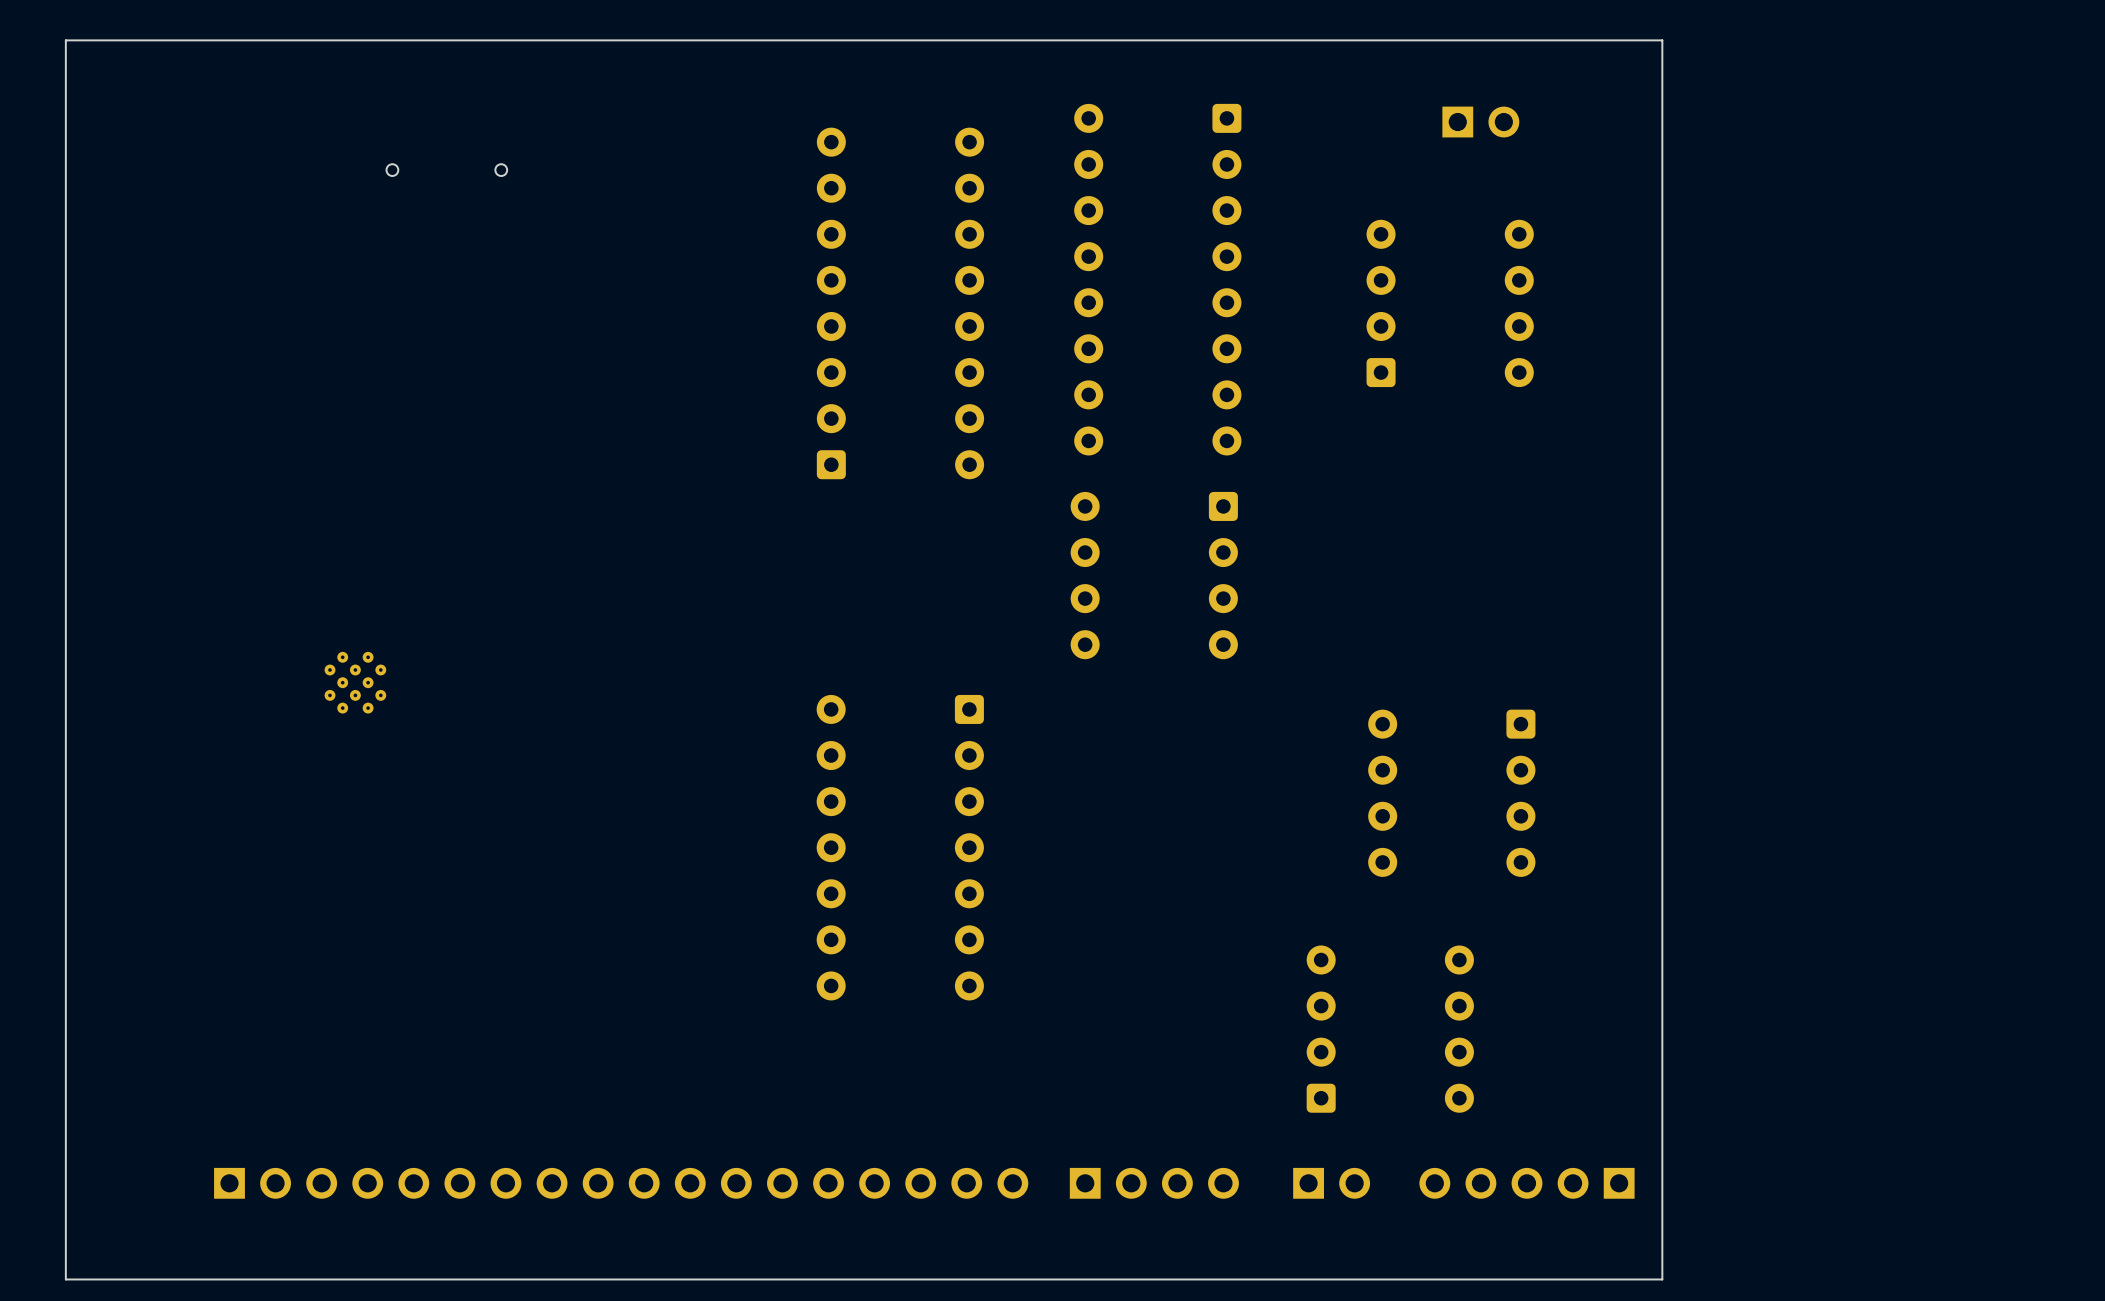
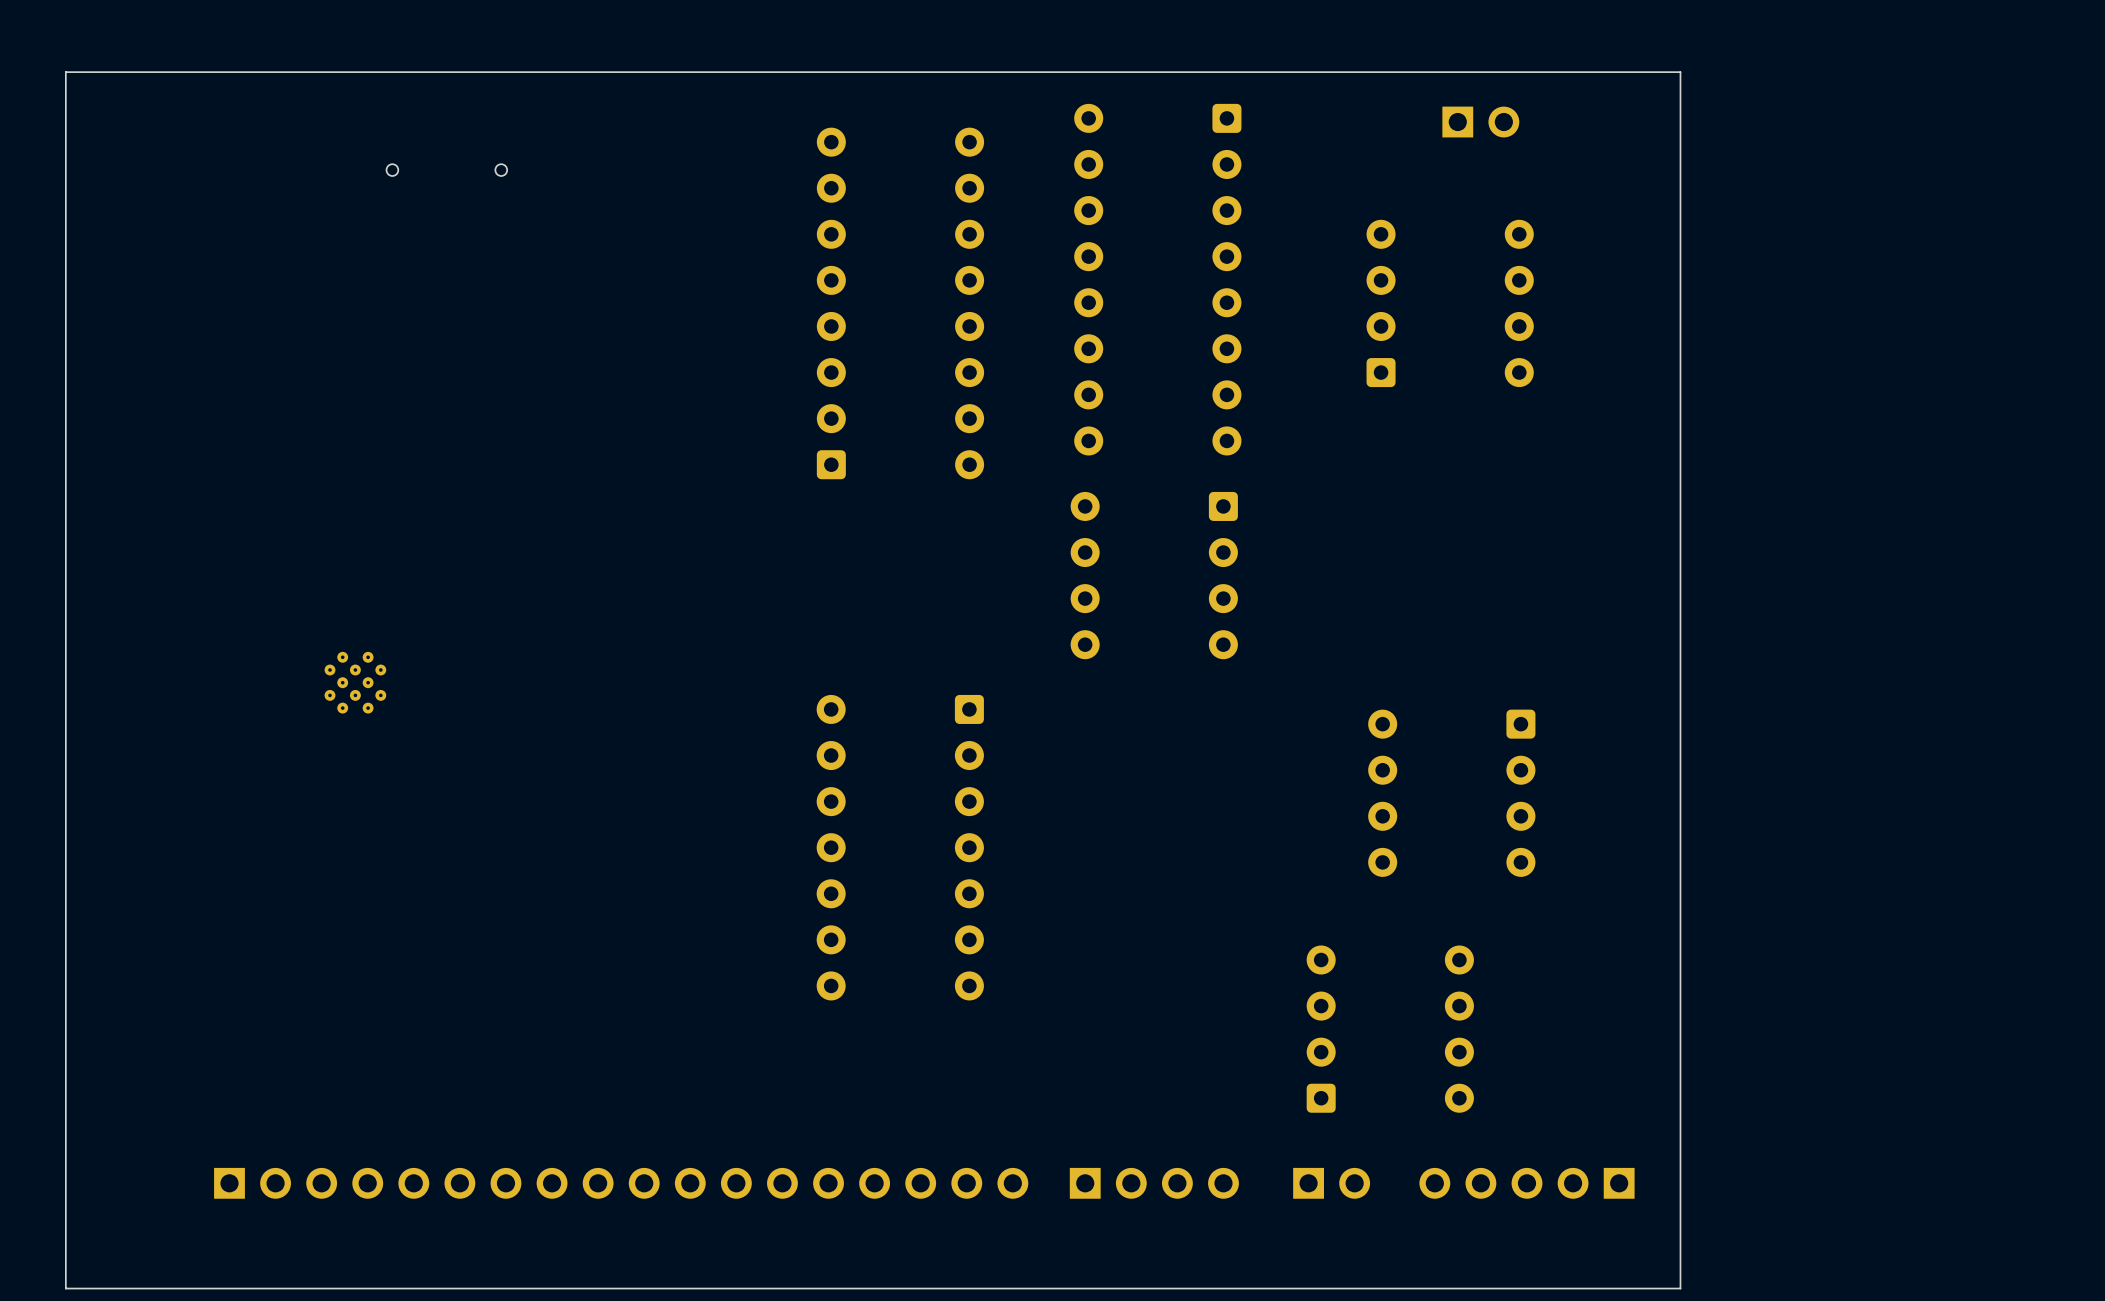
board edge: (65, 72) (65, 40) (1662, 40) (1662, 1279) (65, 1279) -> (65, 72) (1680, 72) (1680, 1288) (65, 1288) (65, 1279)

